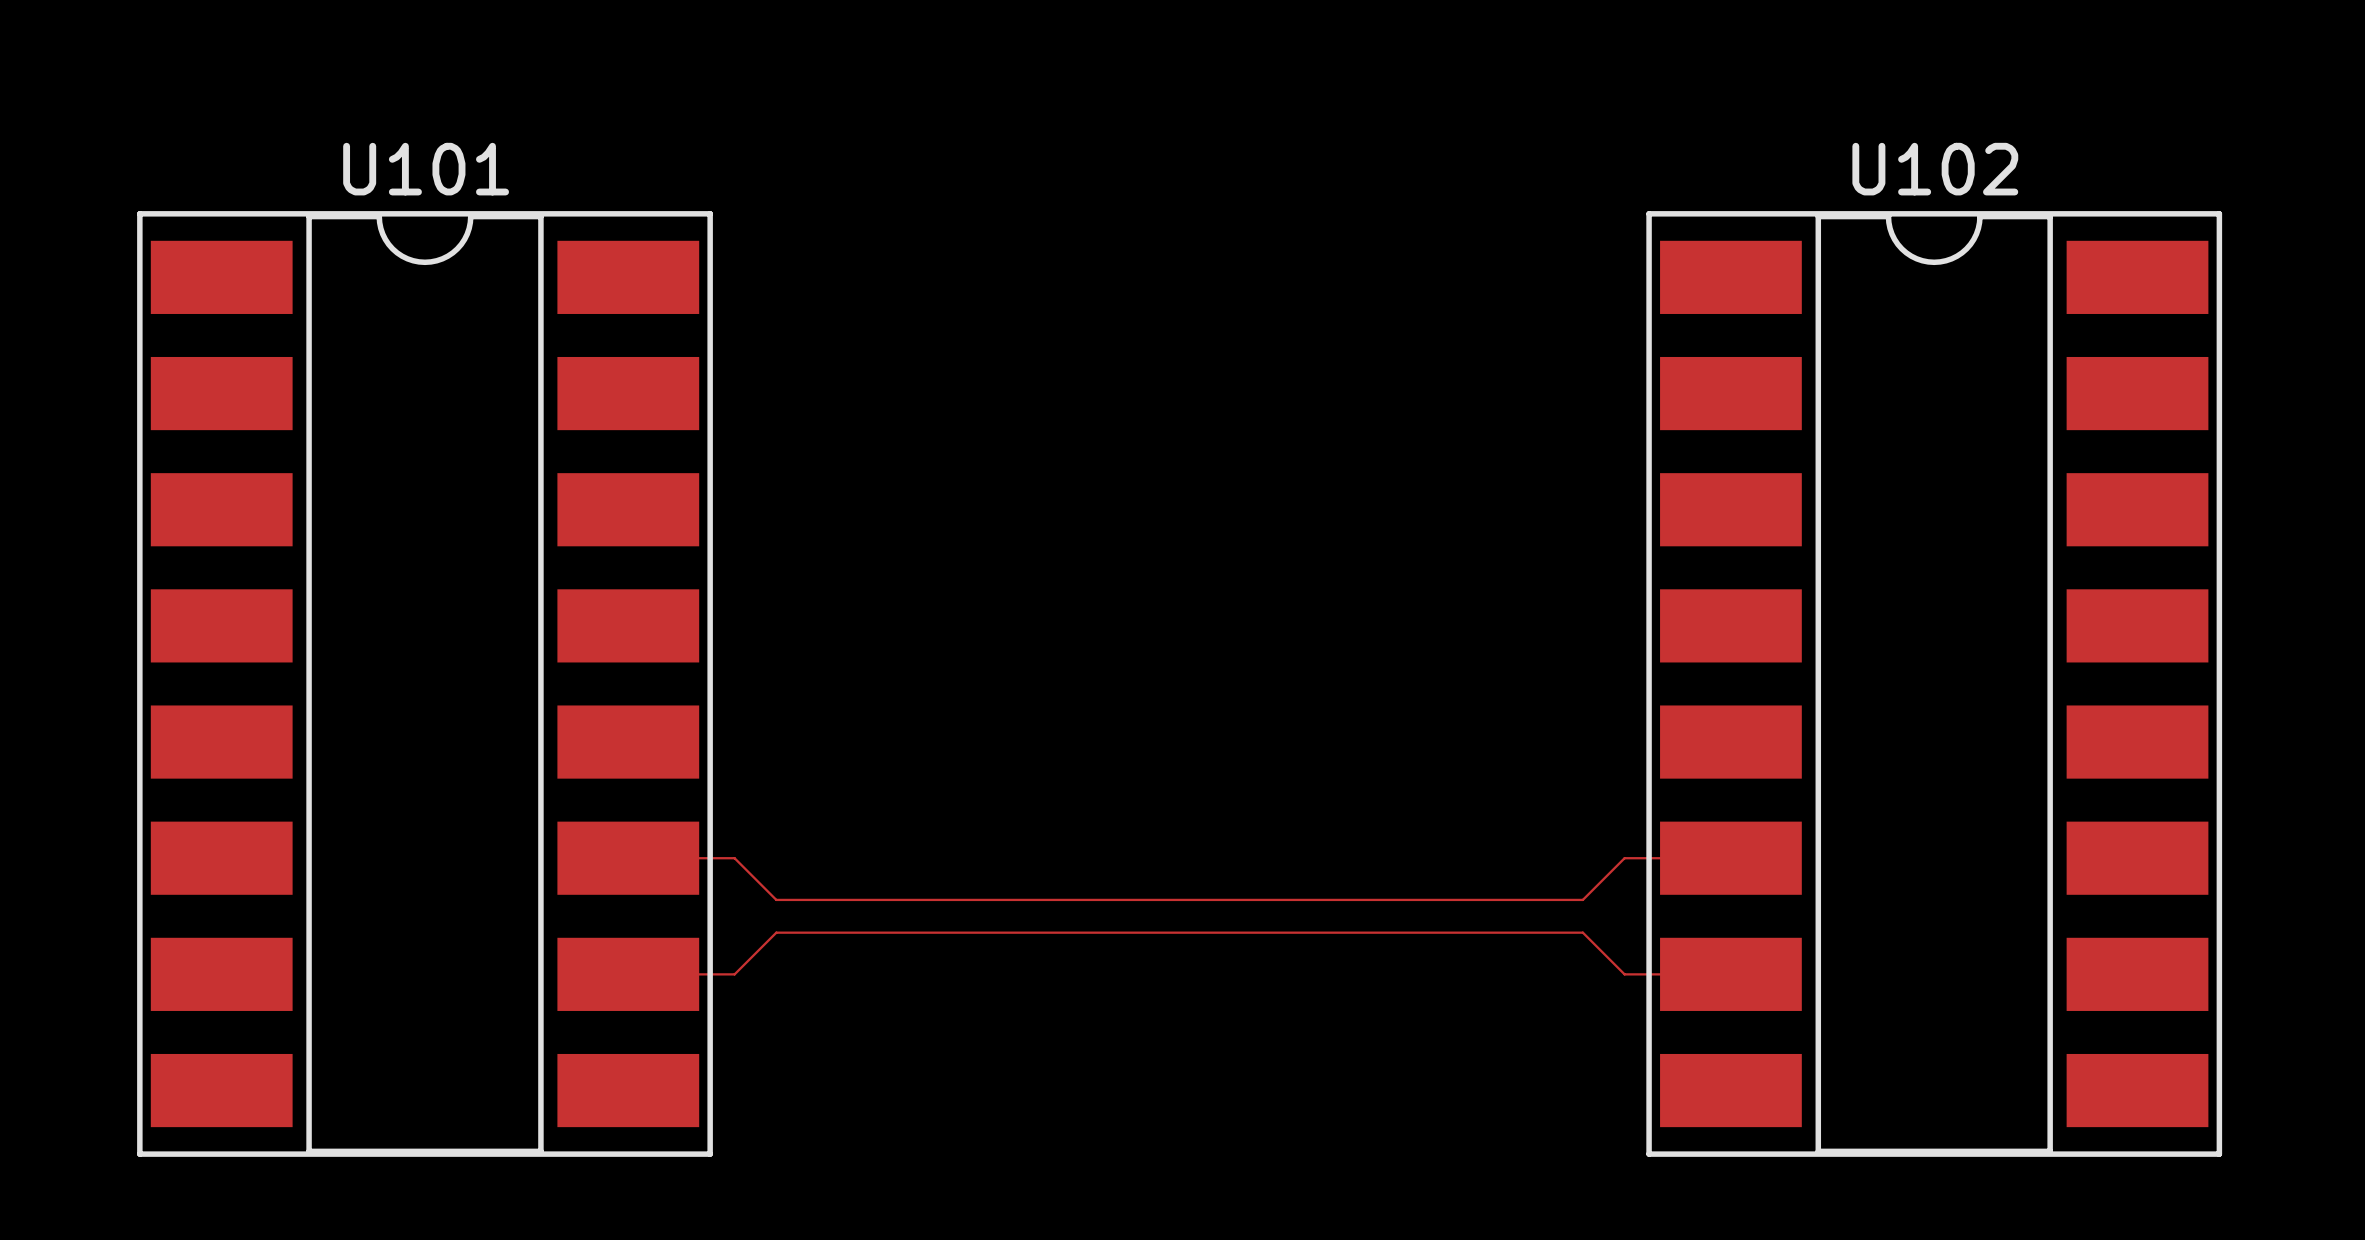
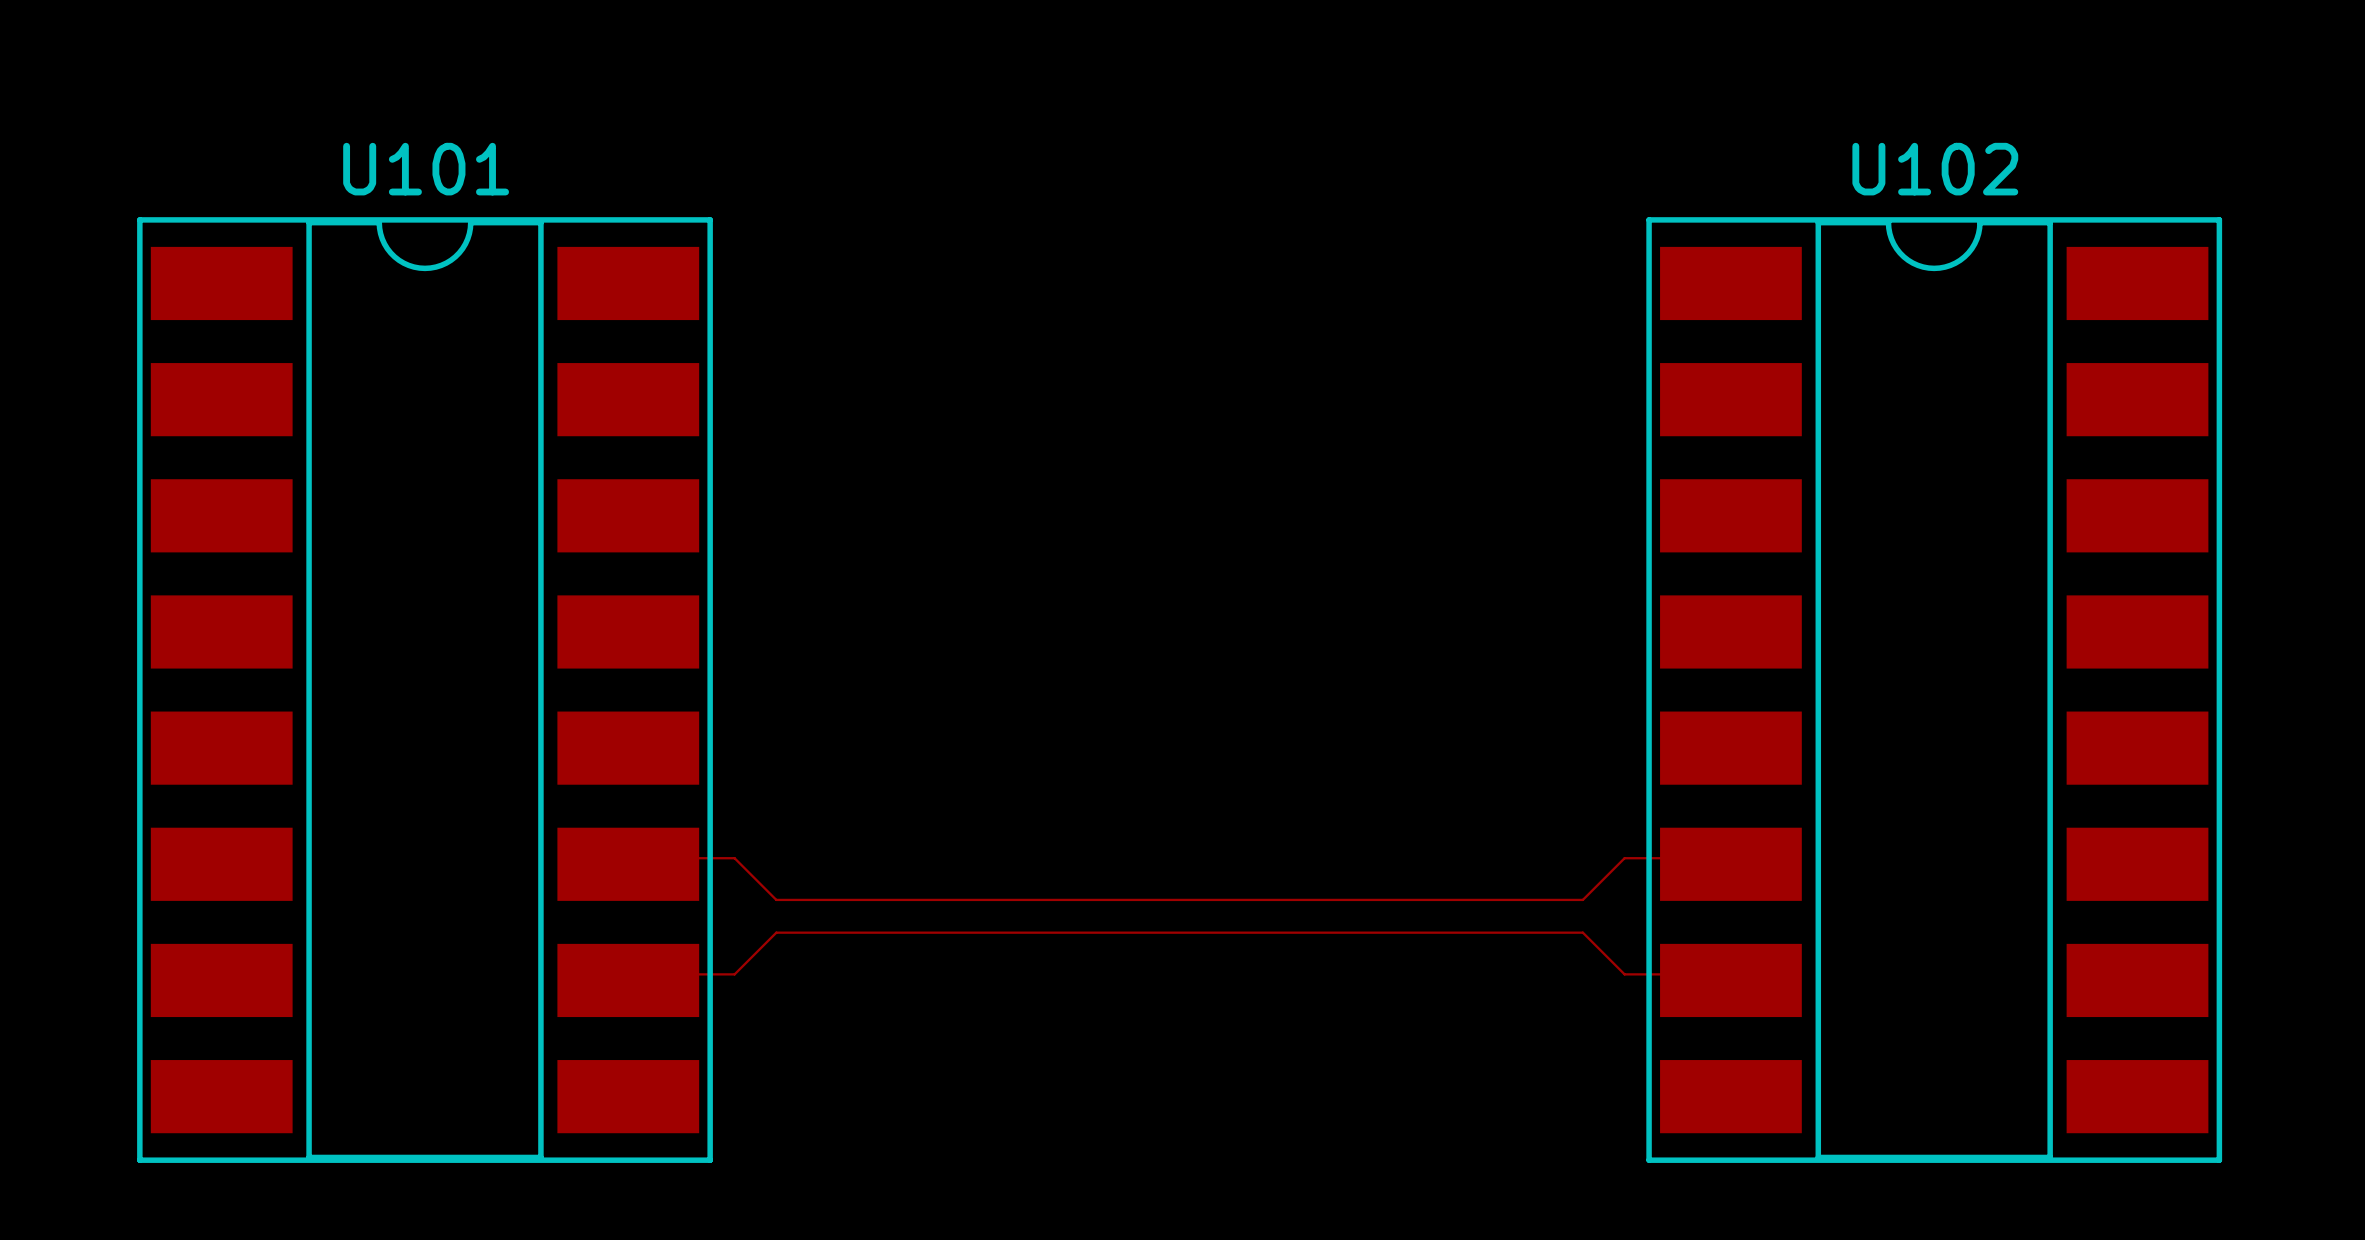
U101 footprint: [137, 211, 713, 1157] -> [137, 217, 713, 1163]
U102 footprint: [1646, 211, 2223, 1157] -> [1646, 217, 2223, 1163]

